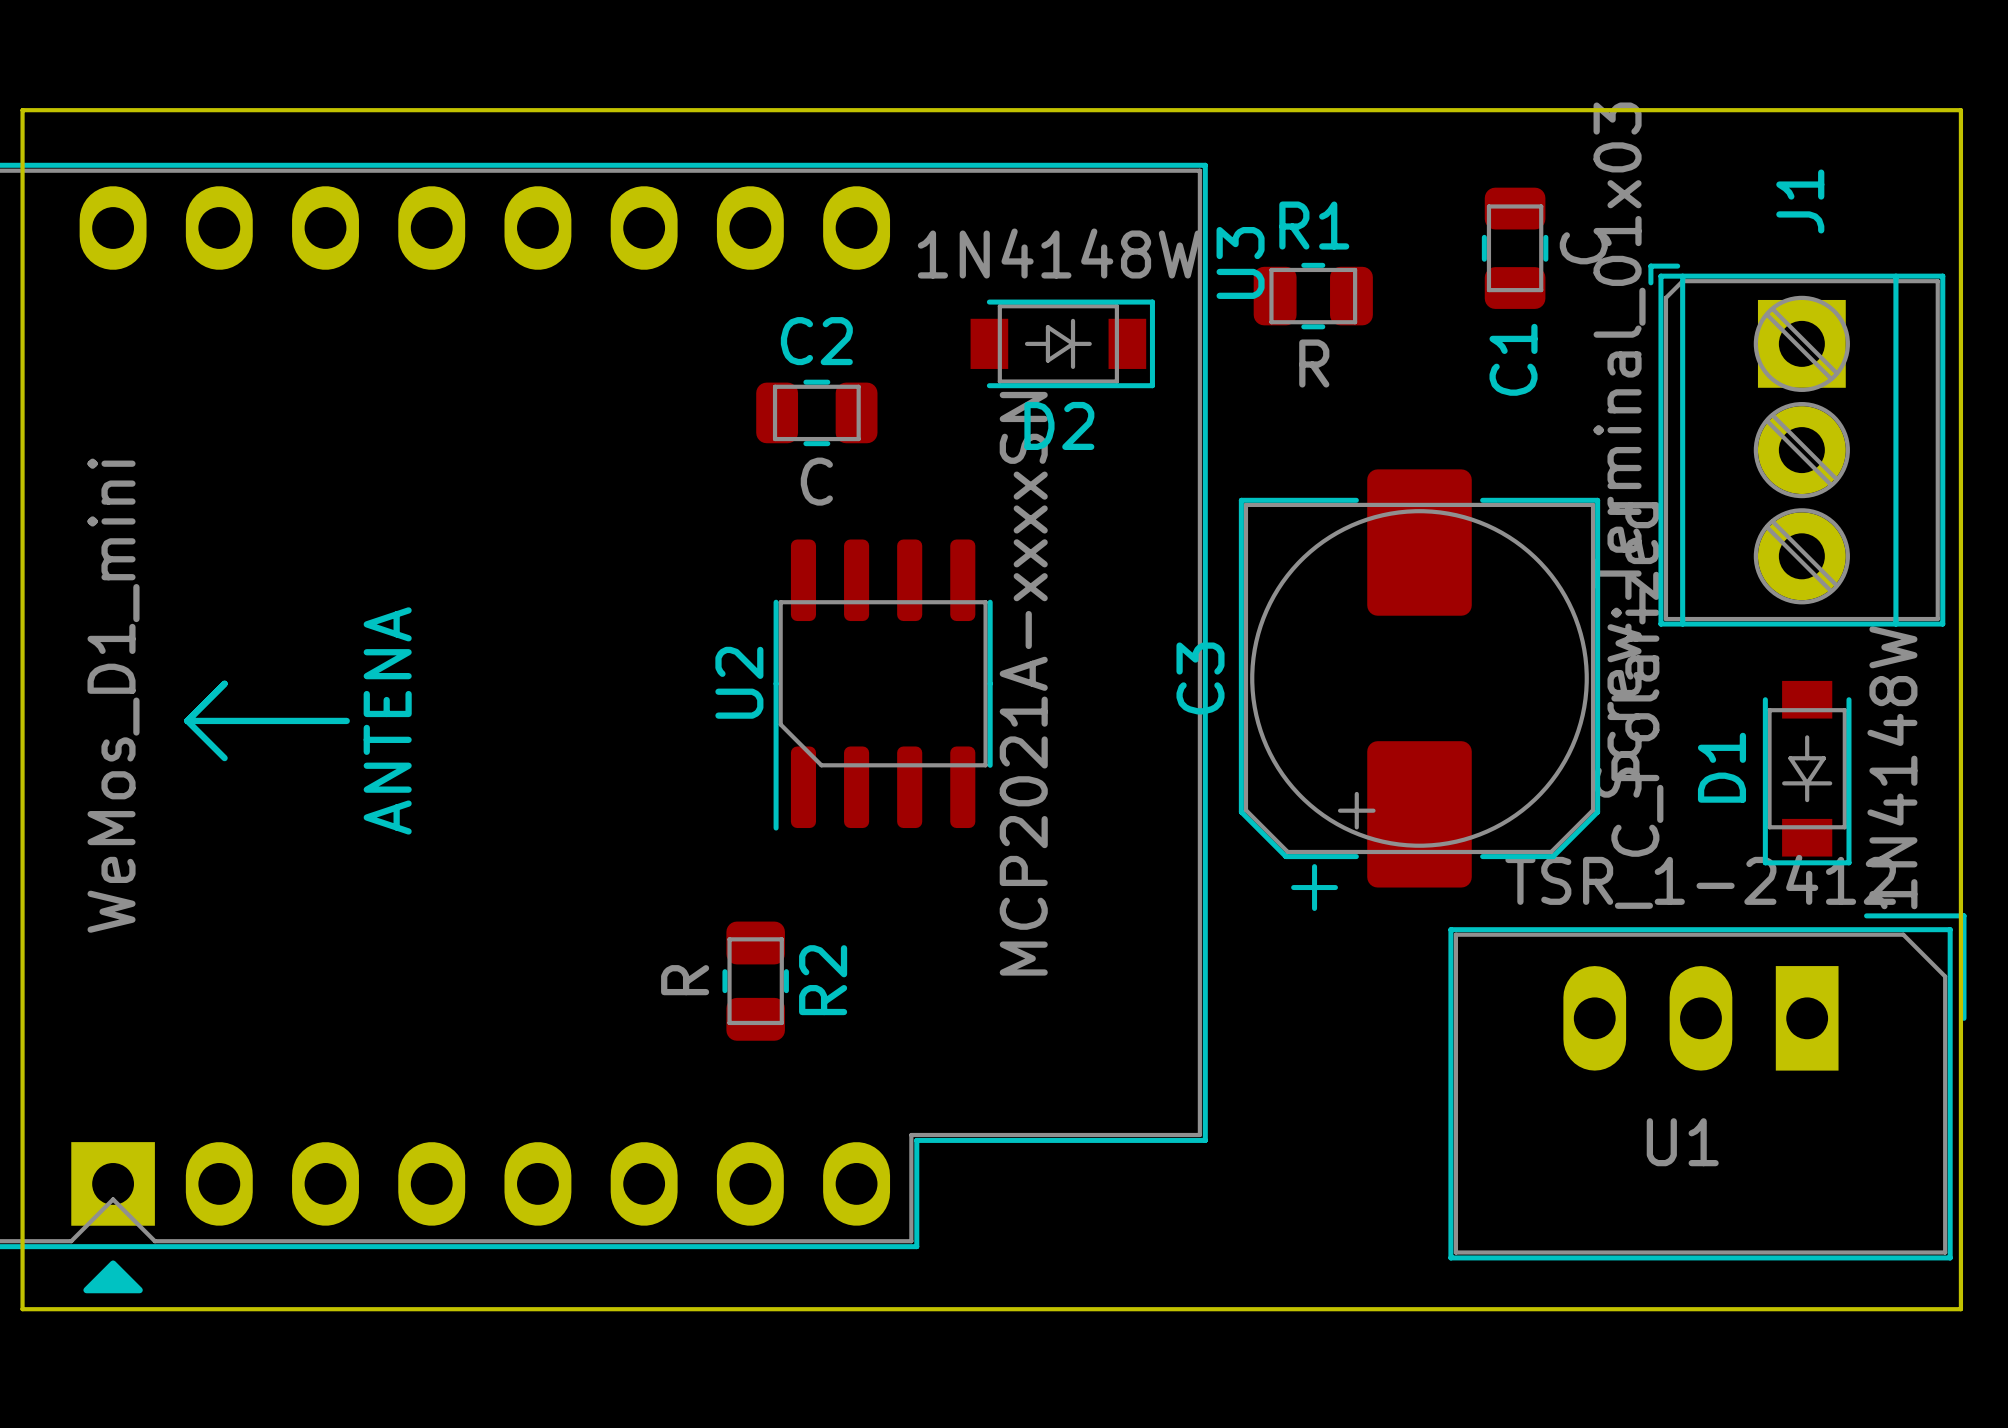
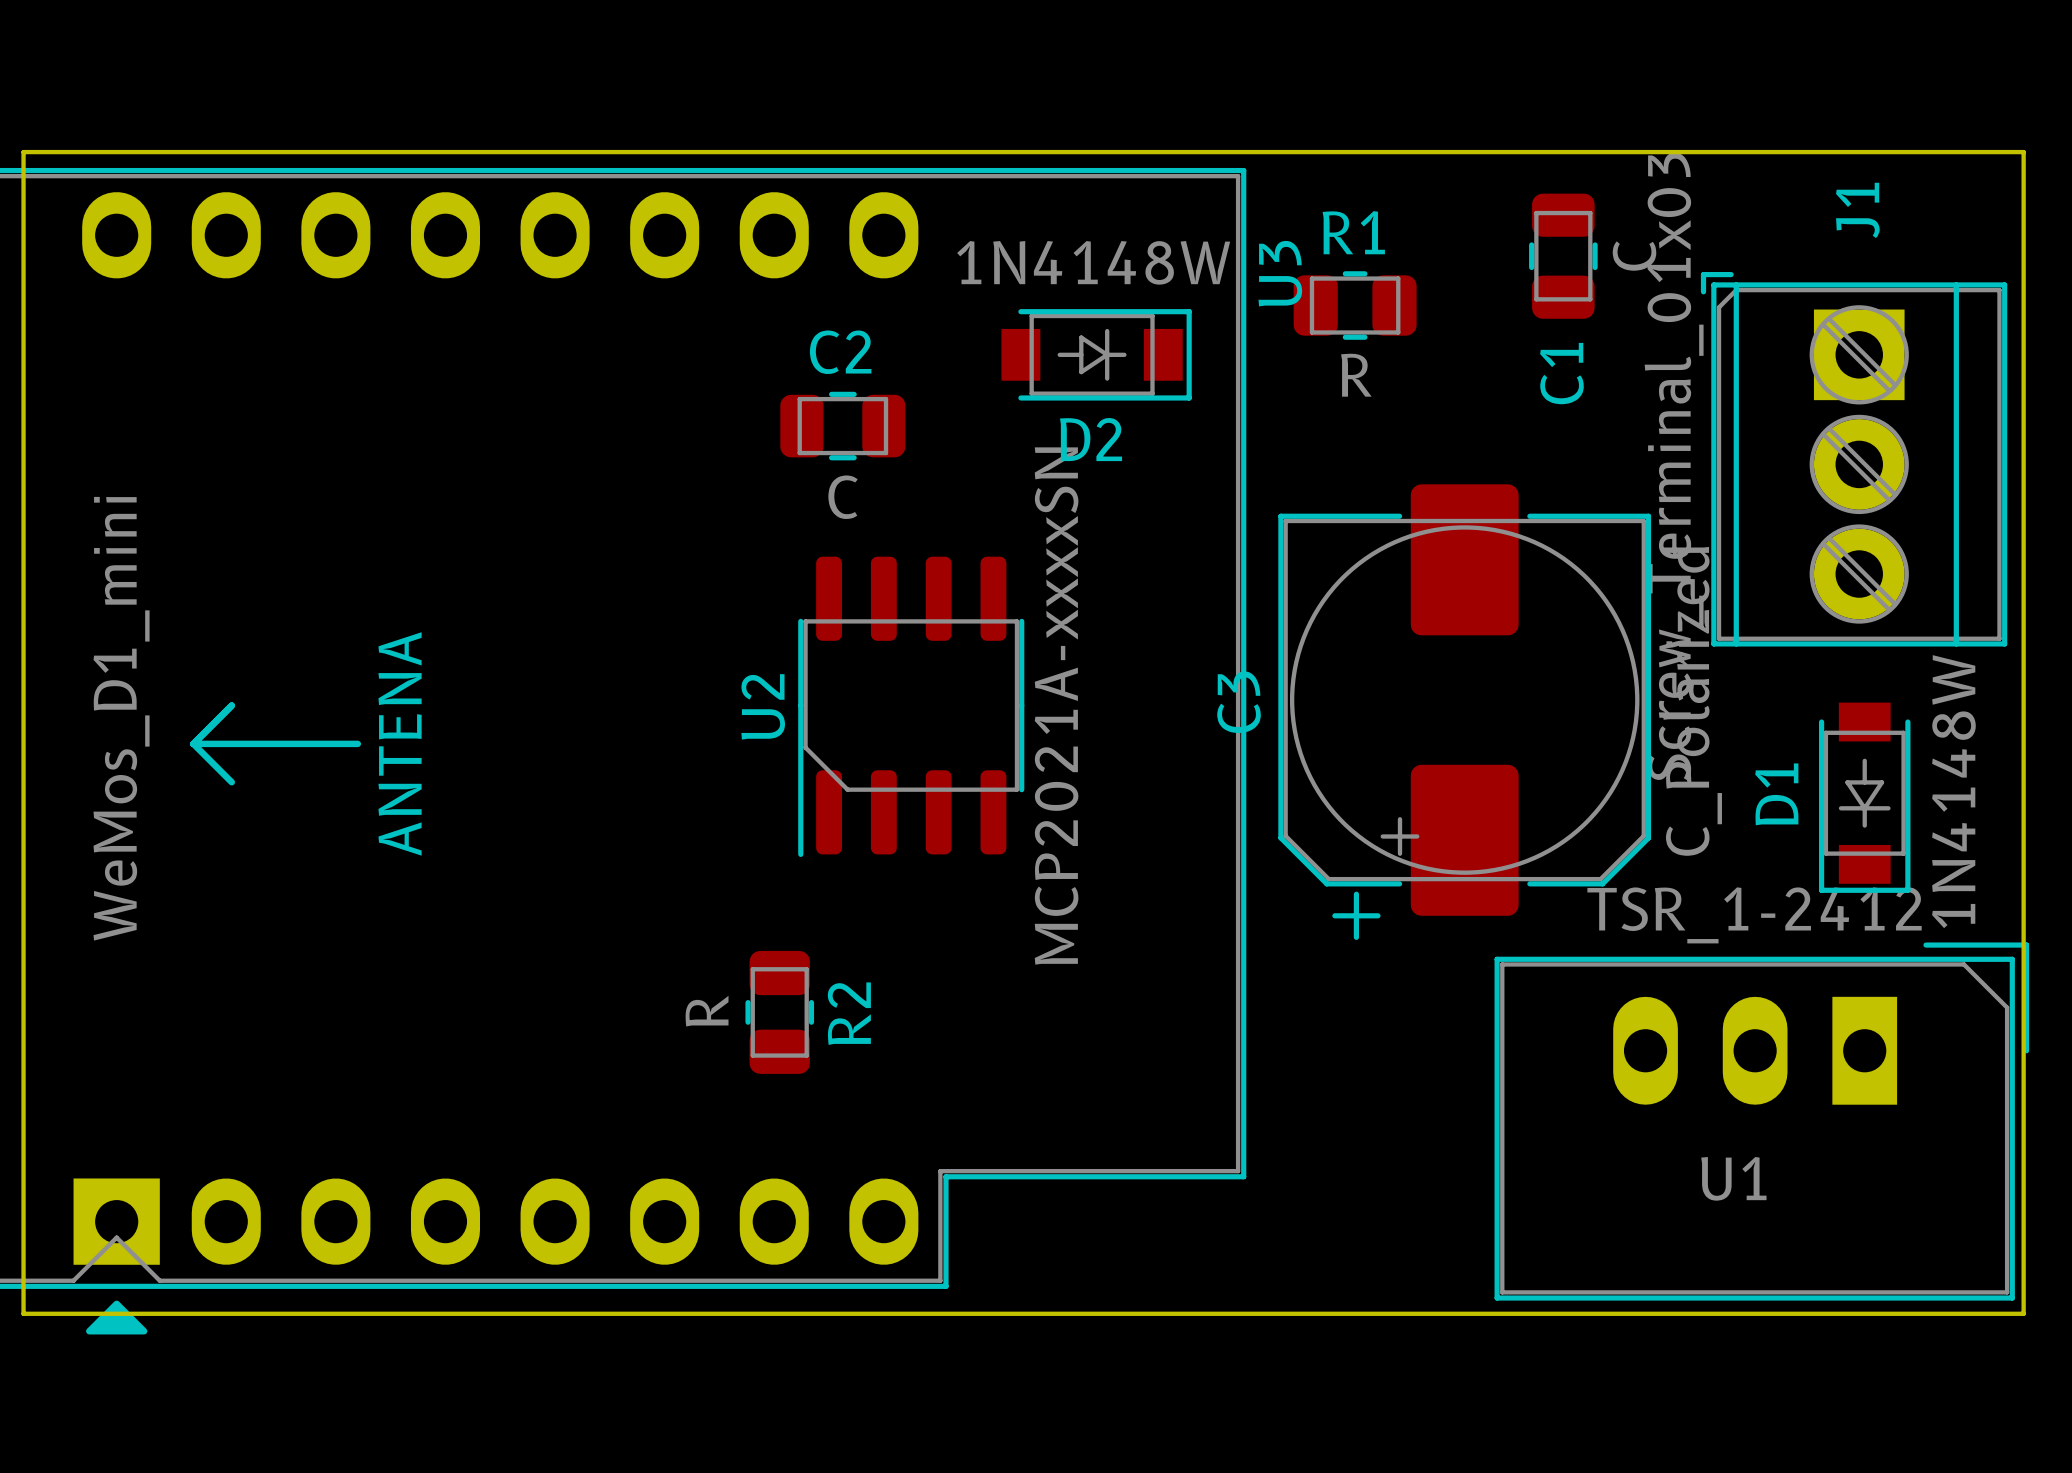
board edge: (22, 110) (1960, 110) (1960, 1309) (22, 1309) (22, 110) -> (23, 152) (23, 1313) (2023, 1313) (2023, 152) (23, 152)

